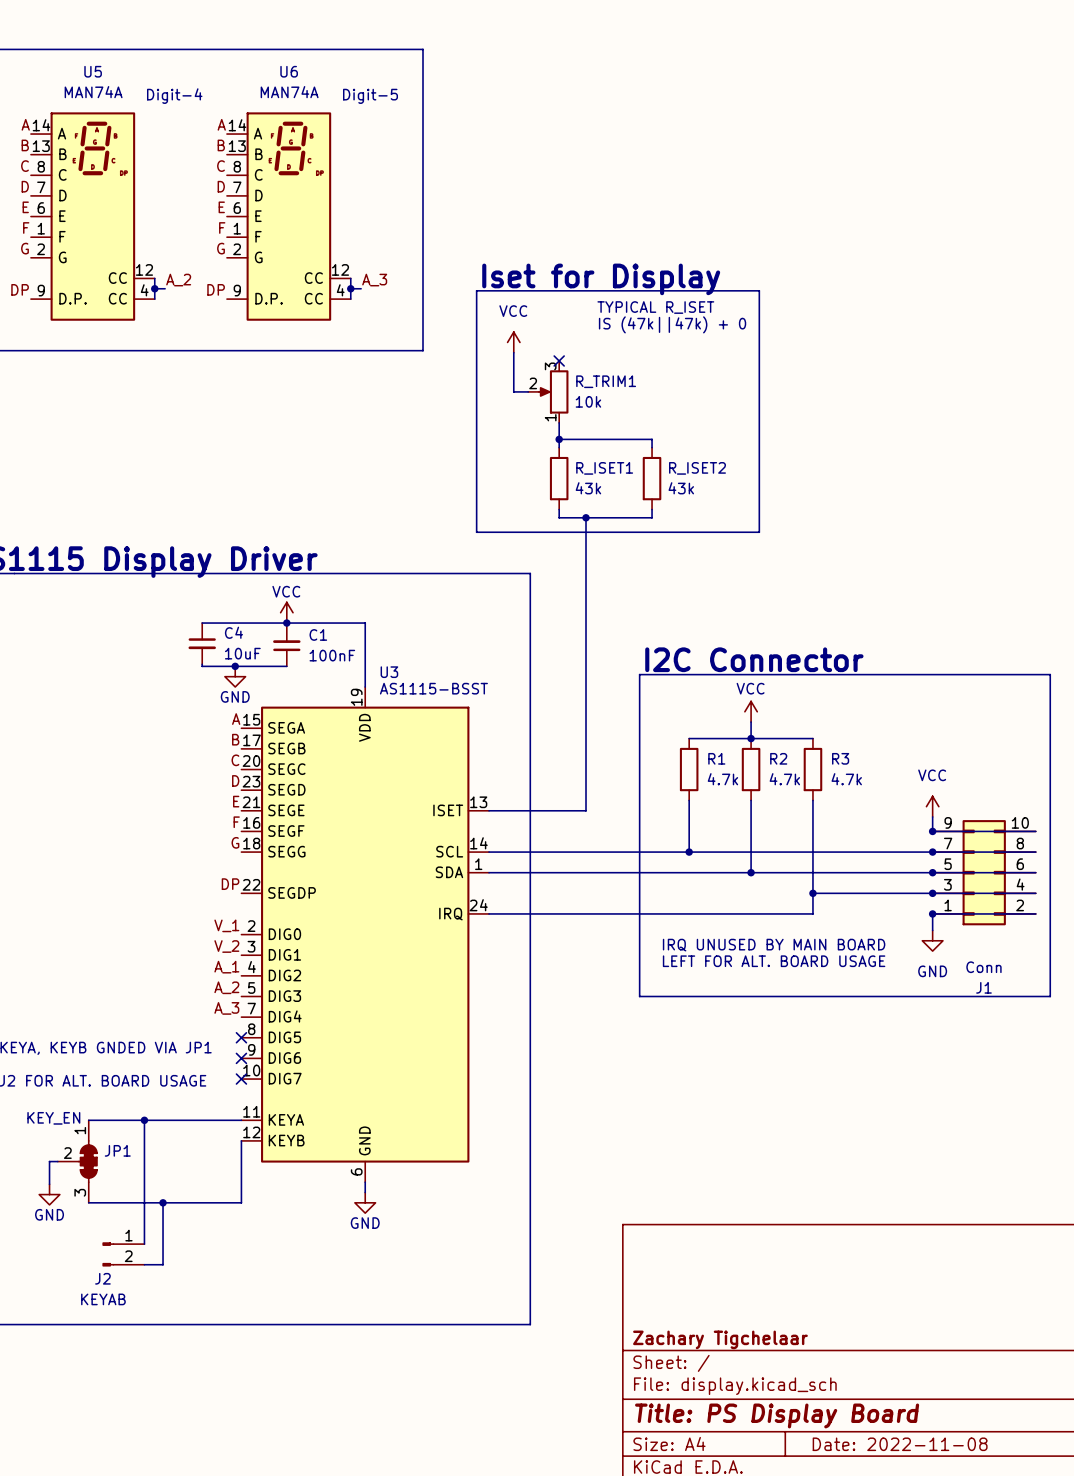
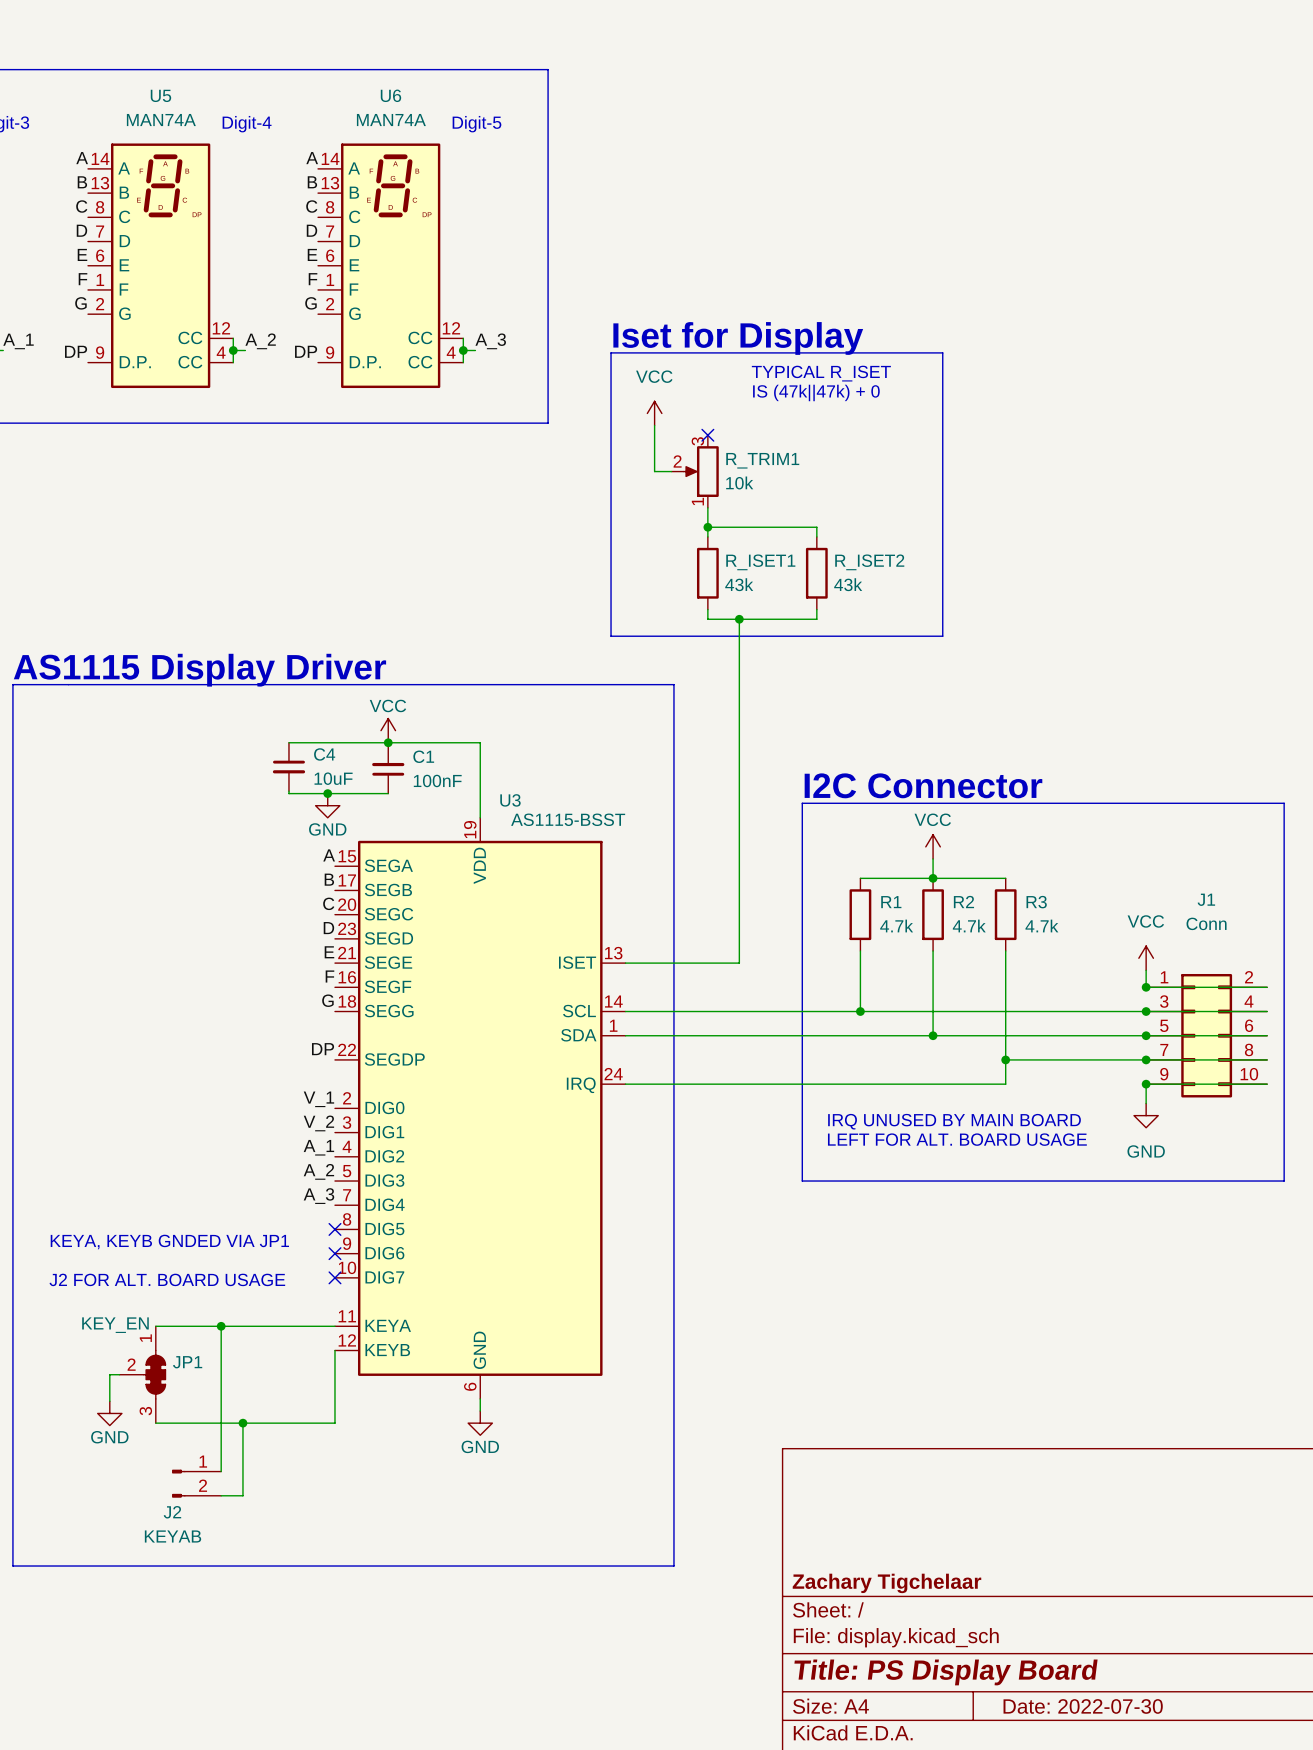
J1 flip: as is (984, 872) -> up-down (1206, 1035)
title block: Date: 2022-11-08 (900, 1444) -> Date: 2022-07-30 (1083, 1706)

